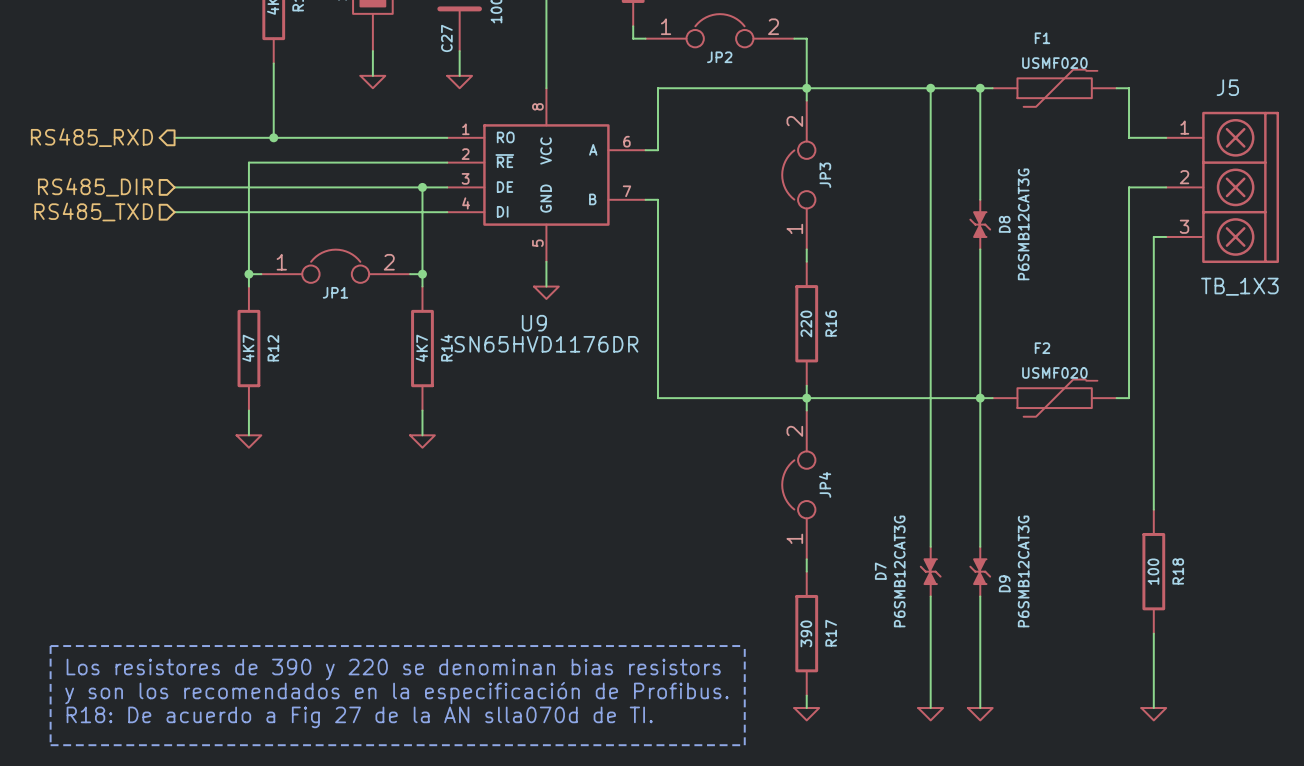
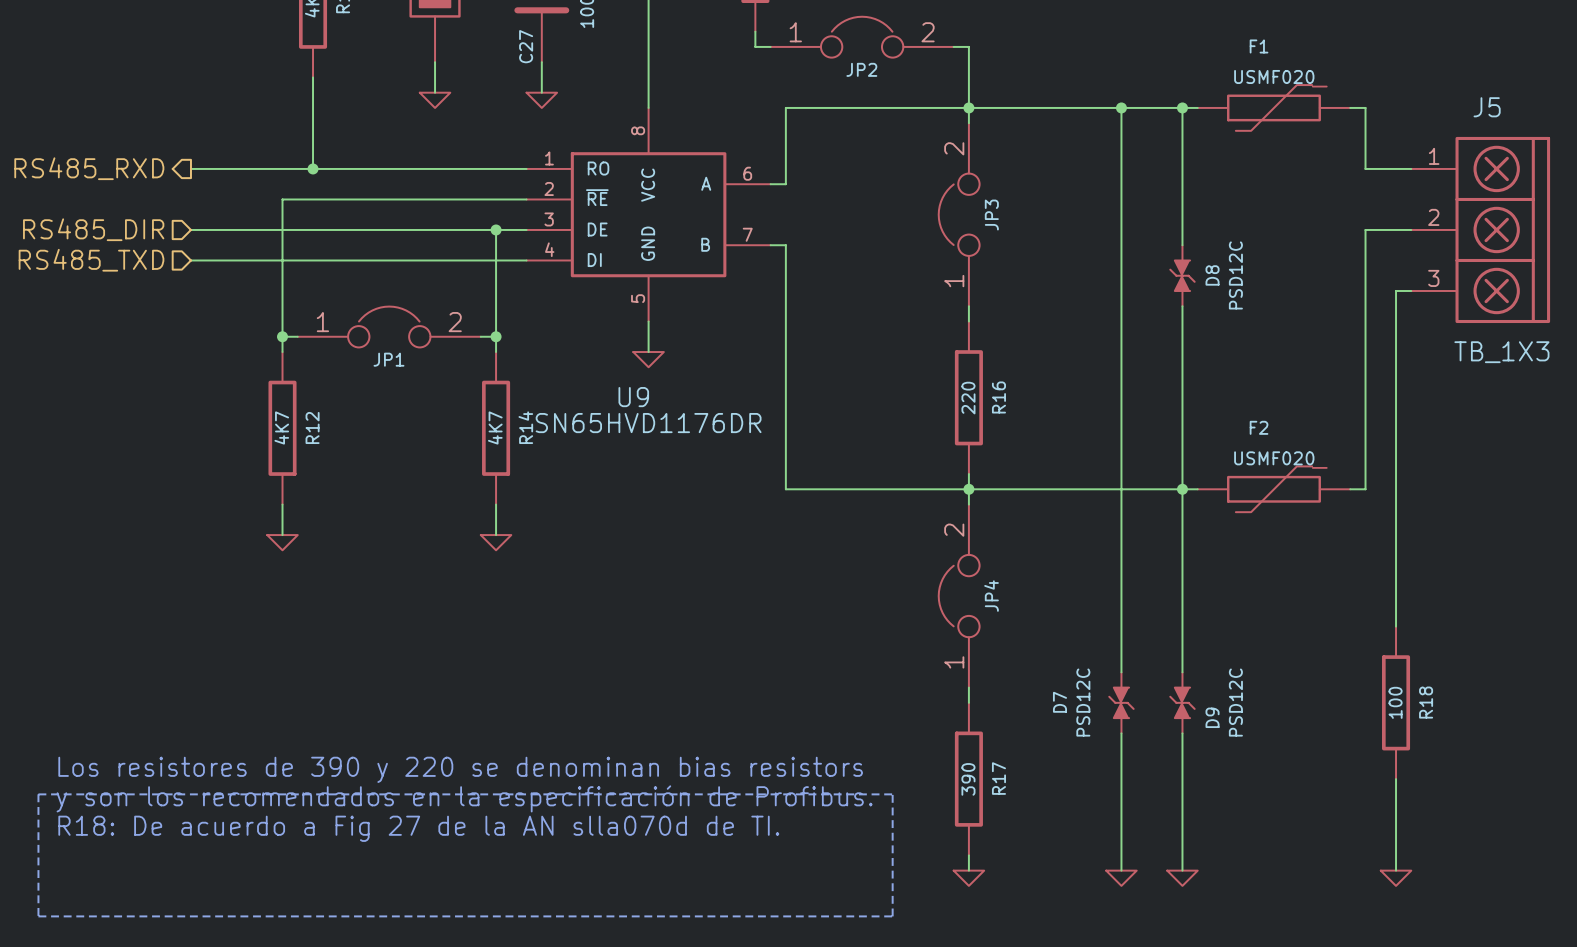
D8 value: P6SMB12CAT3G (1023, 224) -> PSD12C (1235, 275)
D7 value: P6SMB12CAT3G (899, 571) -> PSD12C (1083, 702)
D9 value: P6SMB12CAT3G (1023, 571) -> PSD12C (1235, 702)
text position: Los resistores de 390 y 220 se denominan bias resistors (393, 669) -> Los resistores de 390 y 220 se denominan bias resistors (460, 769)
text position: y son los recomendados en la especificación de Profibus. (396, 693) -> y son los recomendados en la especificación de Profibus. (464, 798)
text position: R18: De acuerdo a Fig 27 de la AN slla070d de TI. (359, 717) -> R18: De acuerdo a Fig 27 de la AN slla070d de TI. (418, 828)

